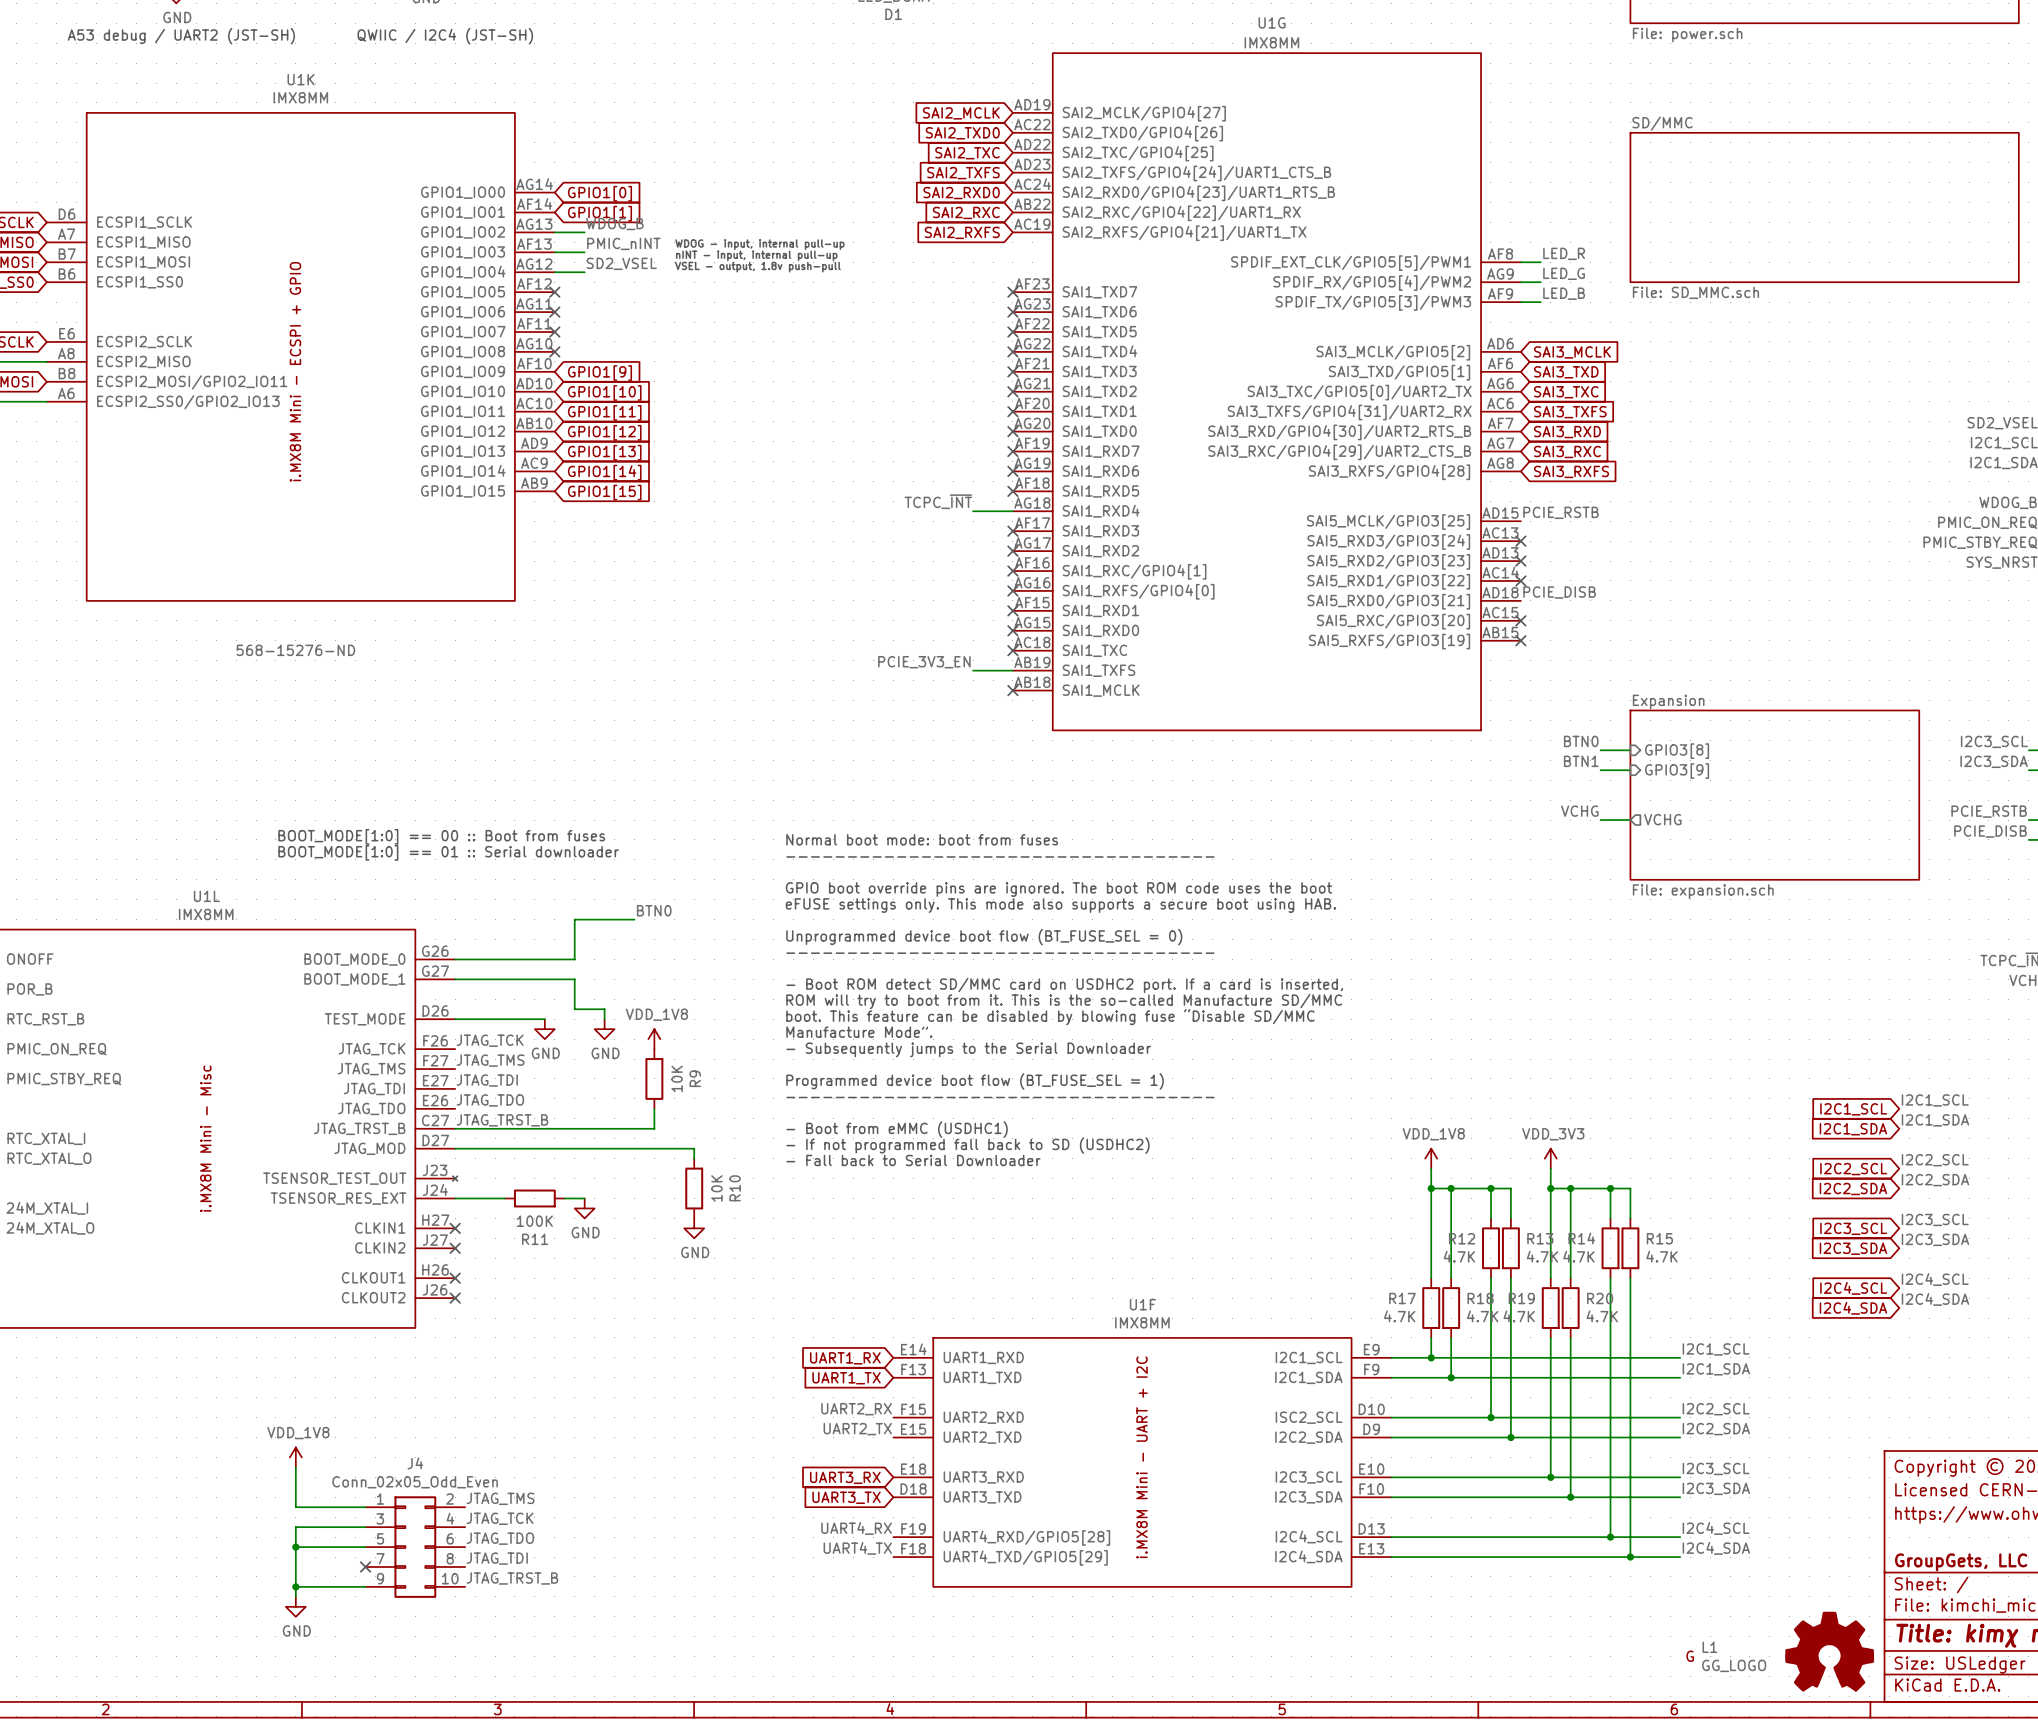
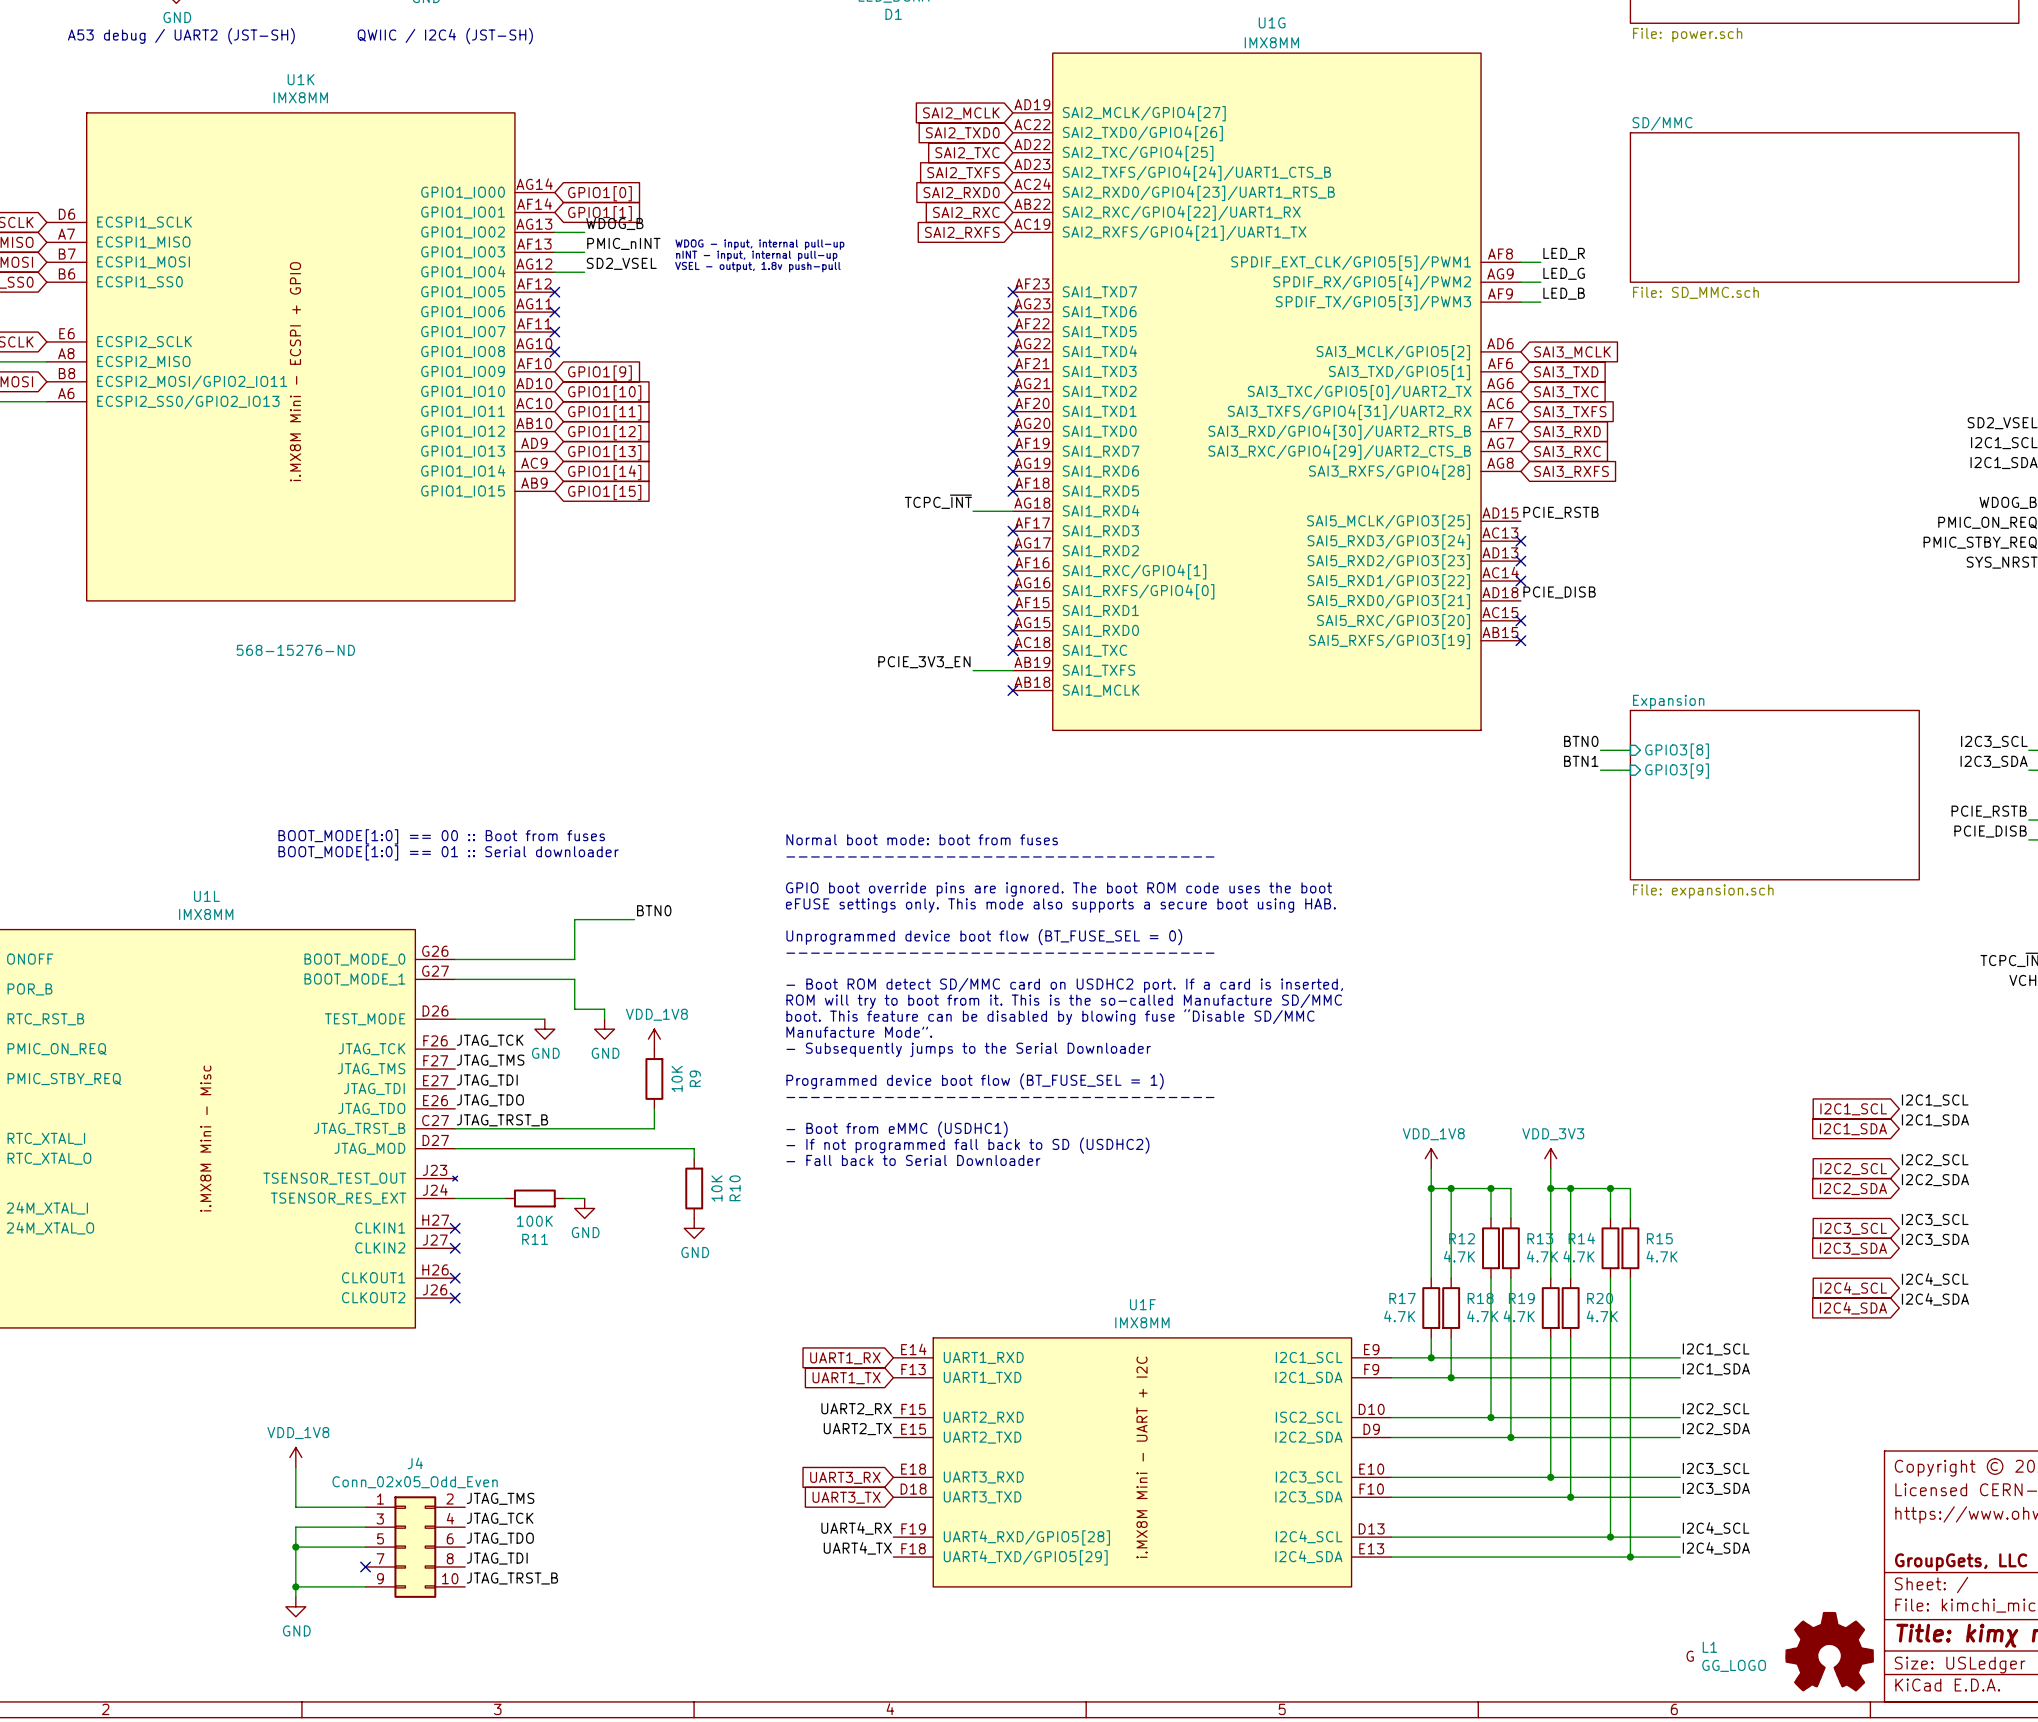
label: VCHG (1579, 811) -> none
sheet pin: VCHG (1662, 819) -> none
wire: (1600, 820) (1630, 820) -> none

